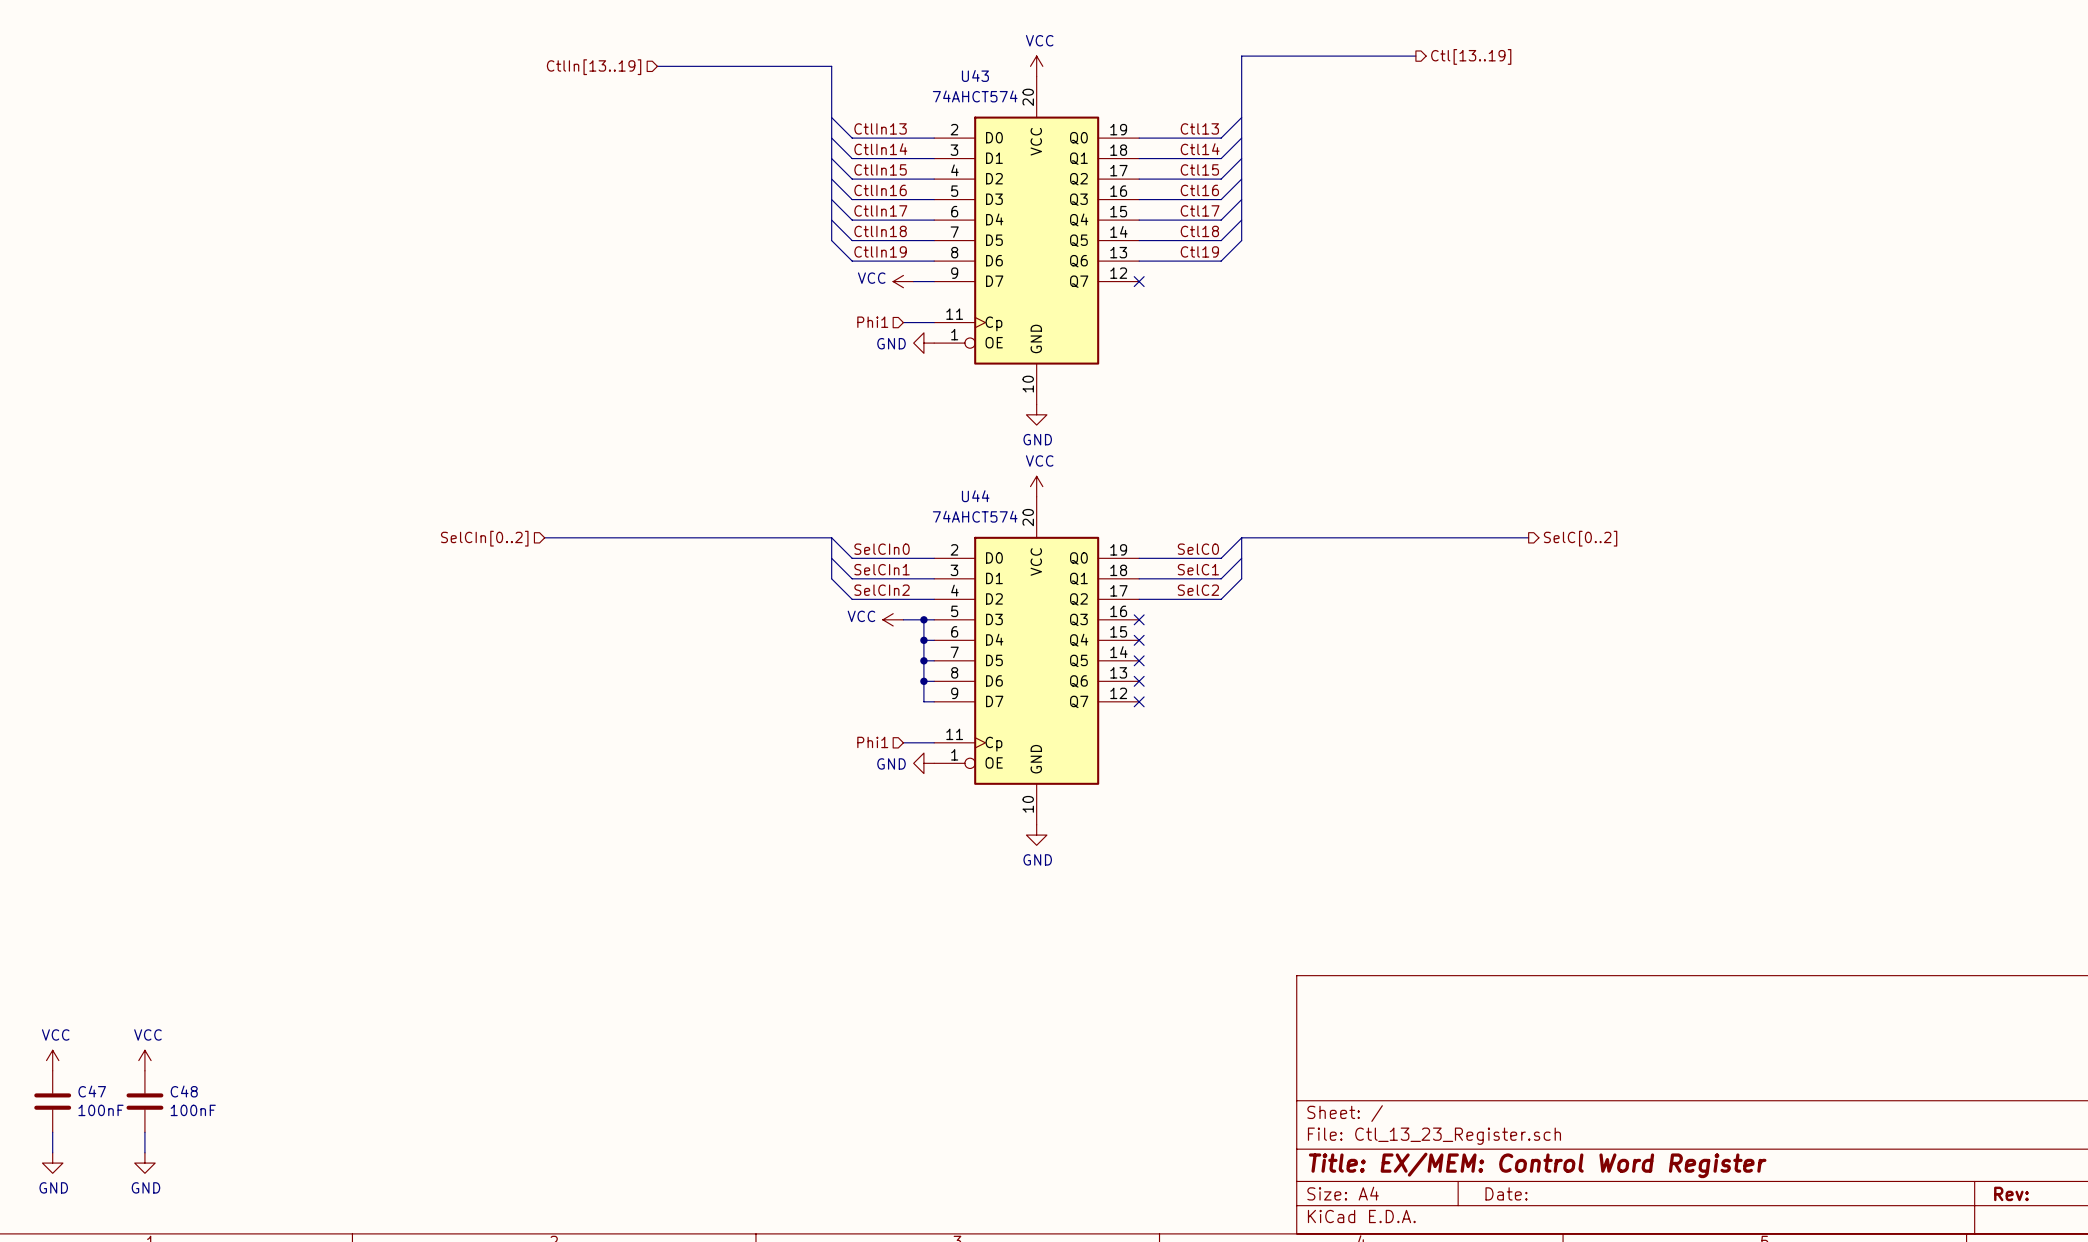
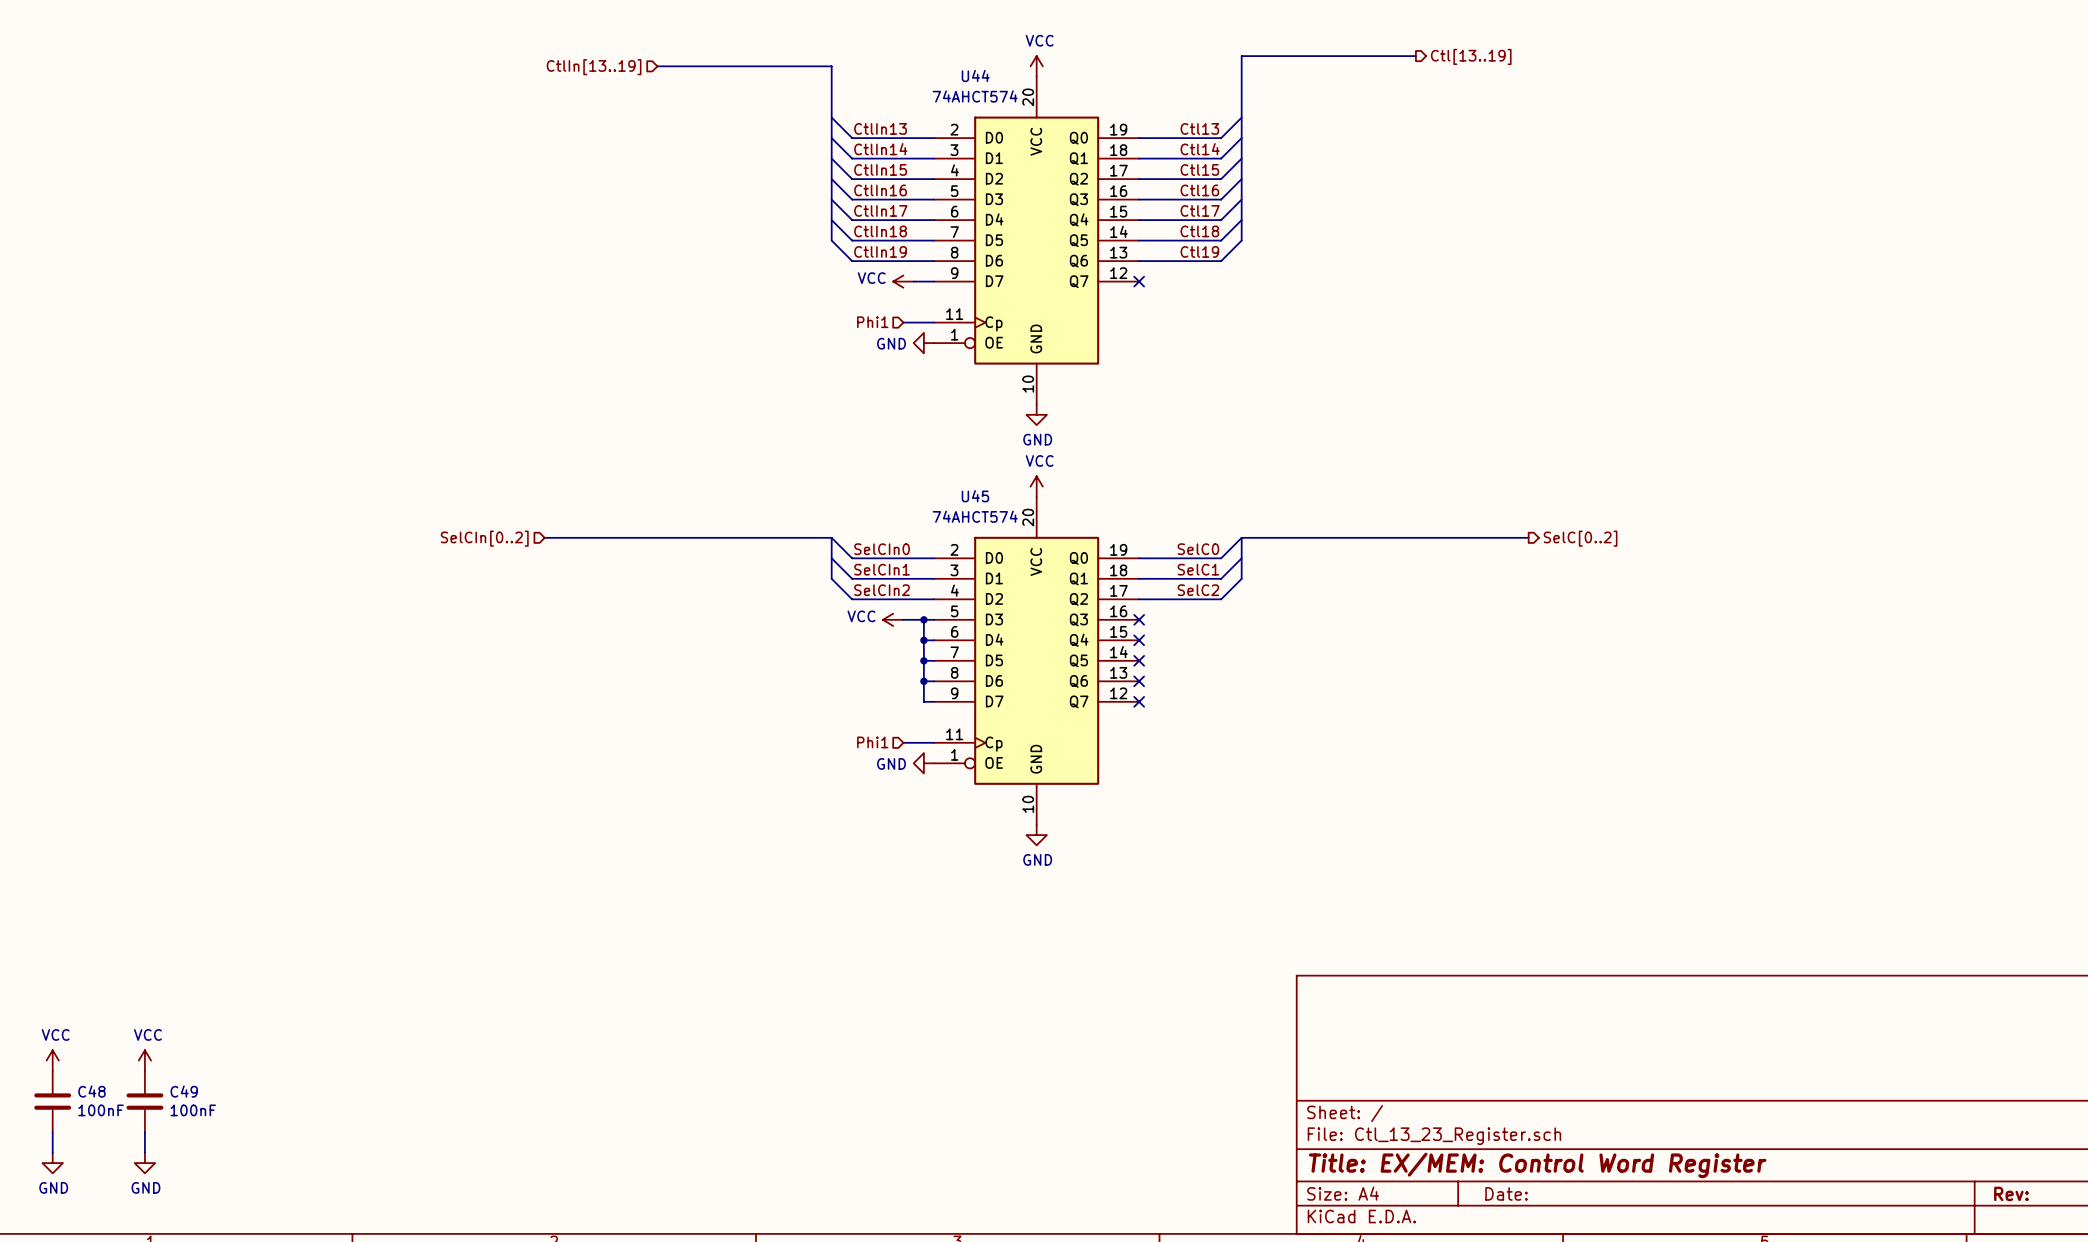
U43 name: U43 (975, 75) -> U44 (975, 75)
U44 name: U44 (975, 496) -> U45 (975, 496)
C47 name: C47 (92, 1091) -> C48 (91, 1091)
C48 name: C48 (184, 1091) -> C49 (184, 1091)

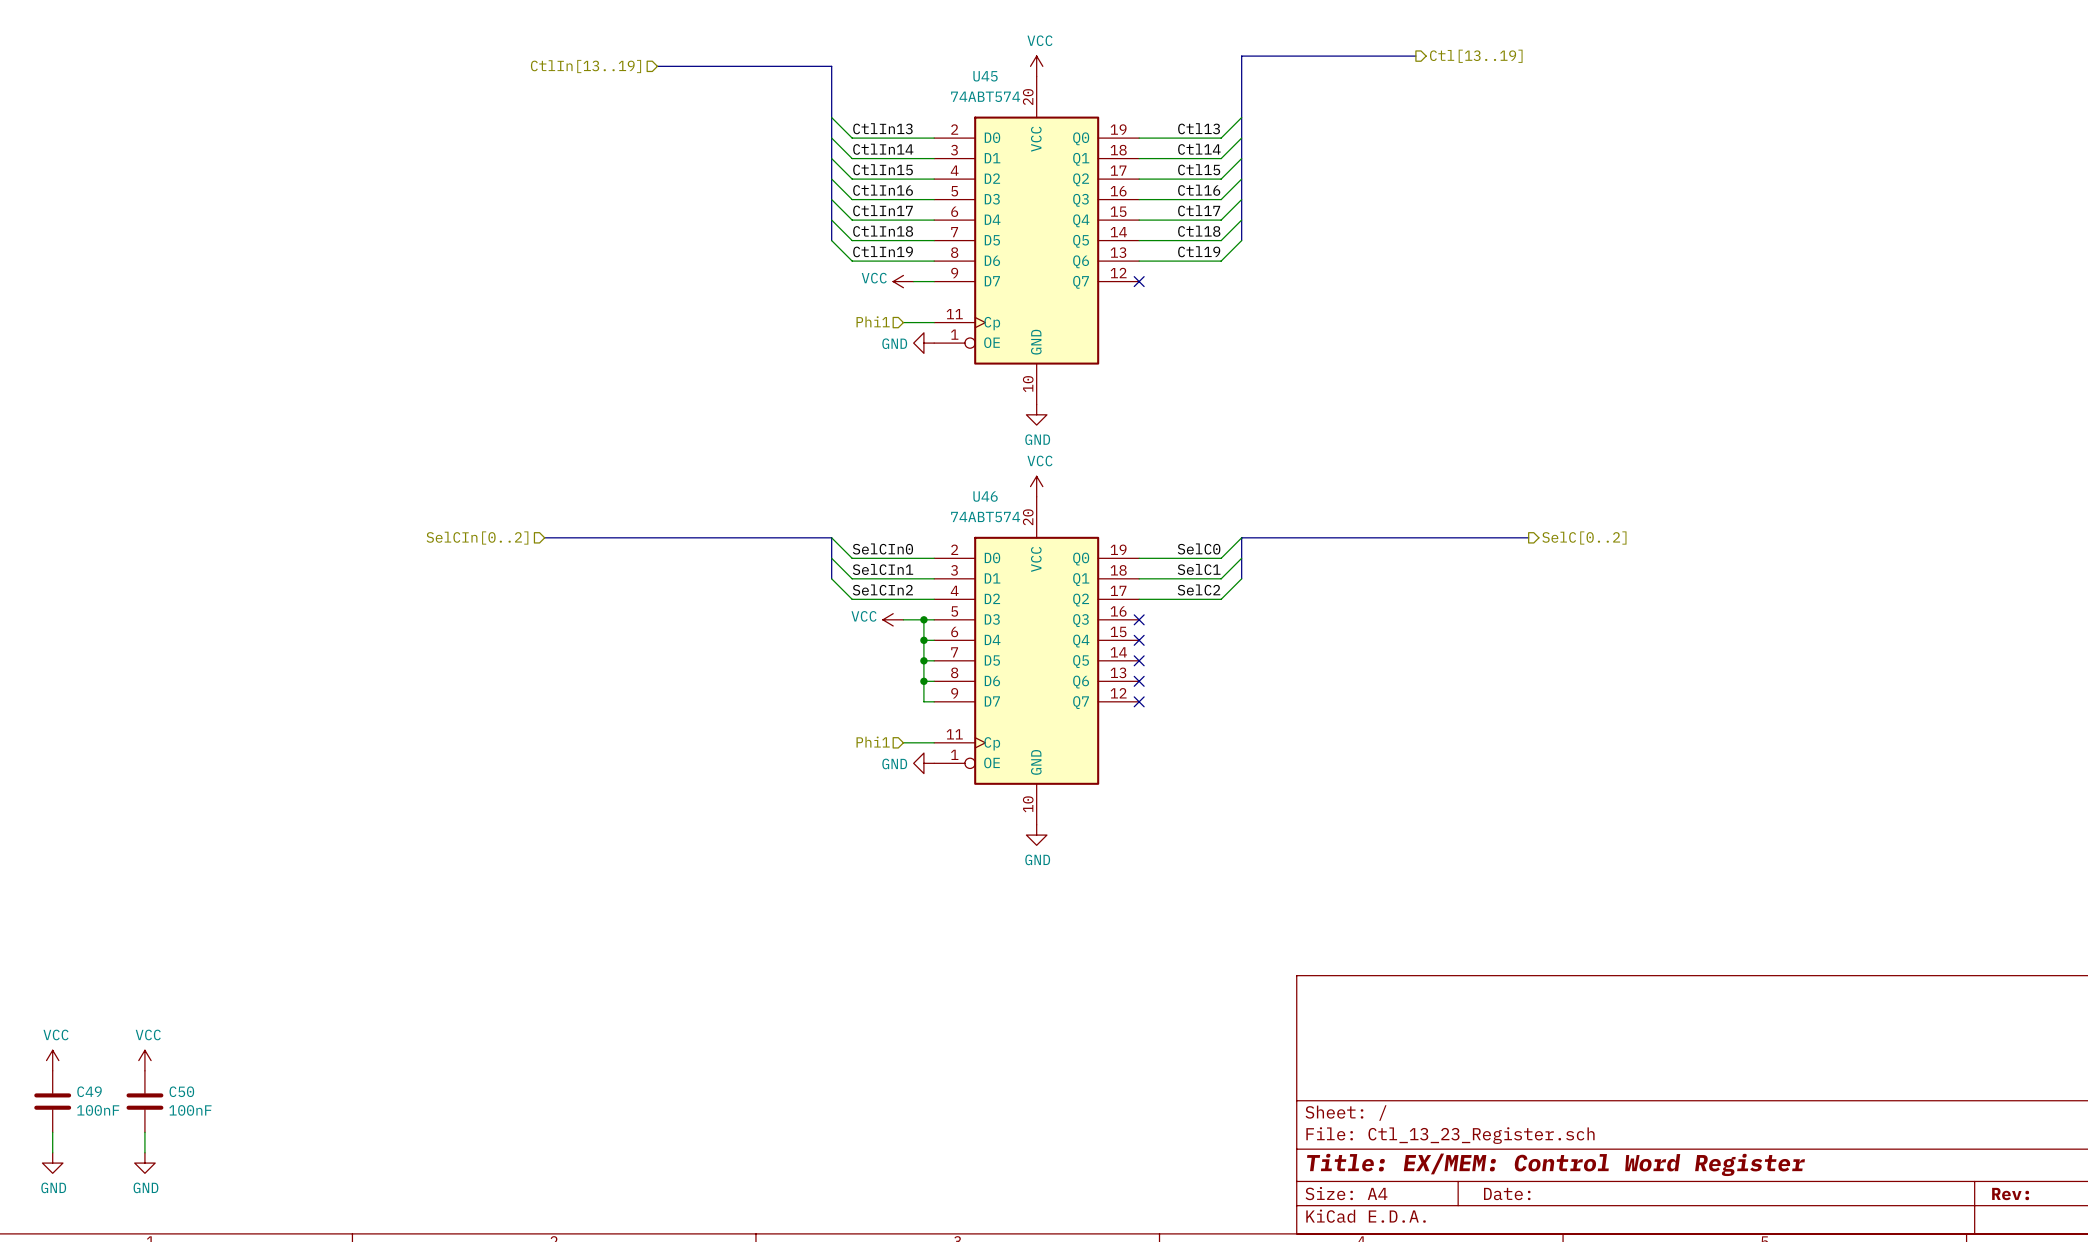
U44 name: U44 (975, 75) -> U45 (985, 76)
U44 value: 74AHCT574 (975, 96) -> 74ABT574 (985, 96)
U45 name: U45 (975, 496) -> U46 (985, 496)
U45 value: 74AHCT574 (975, 516) -> 74ABT574 (985, 517)
C48 name: C48 (91, 1091) -> C49 (89, 1091)
C49 name: C49 (184, 1091) -> C50 (181, 1091)

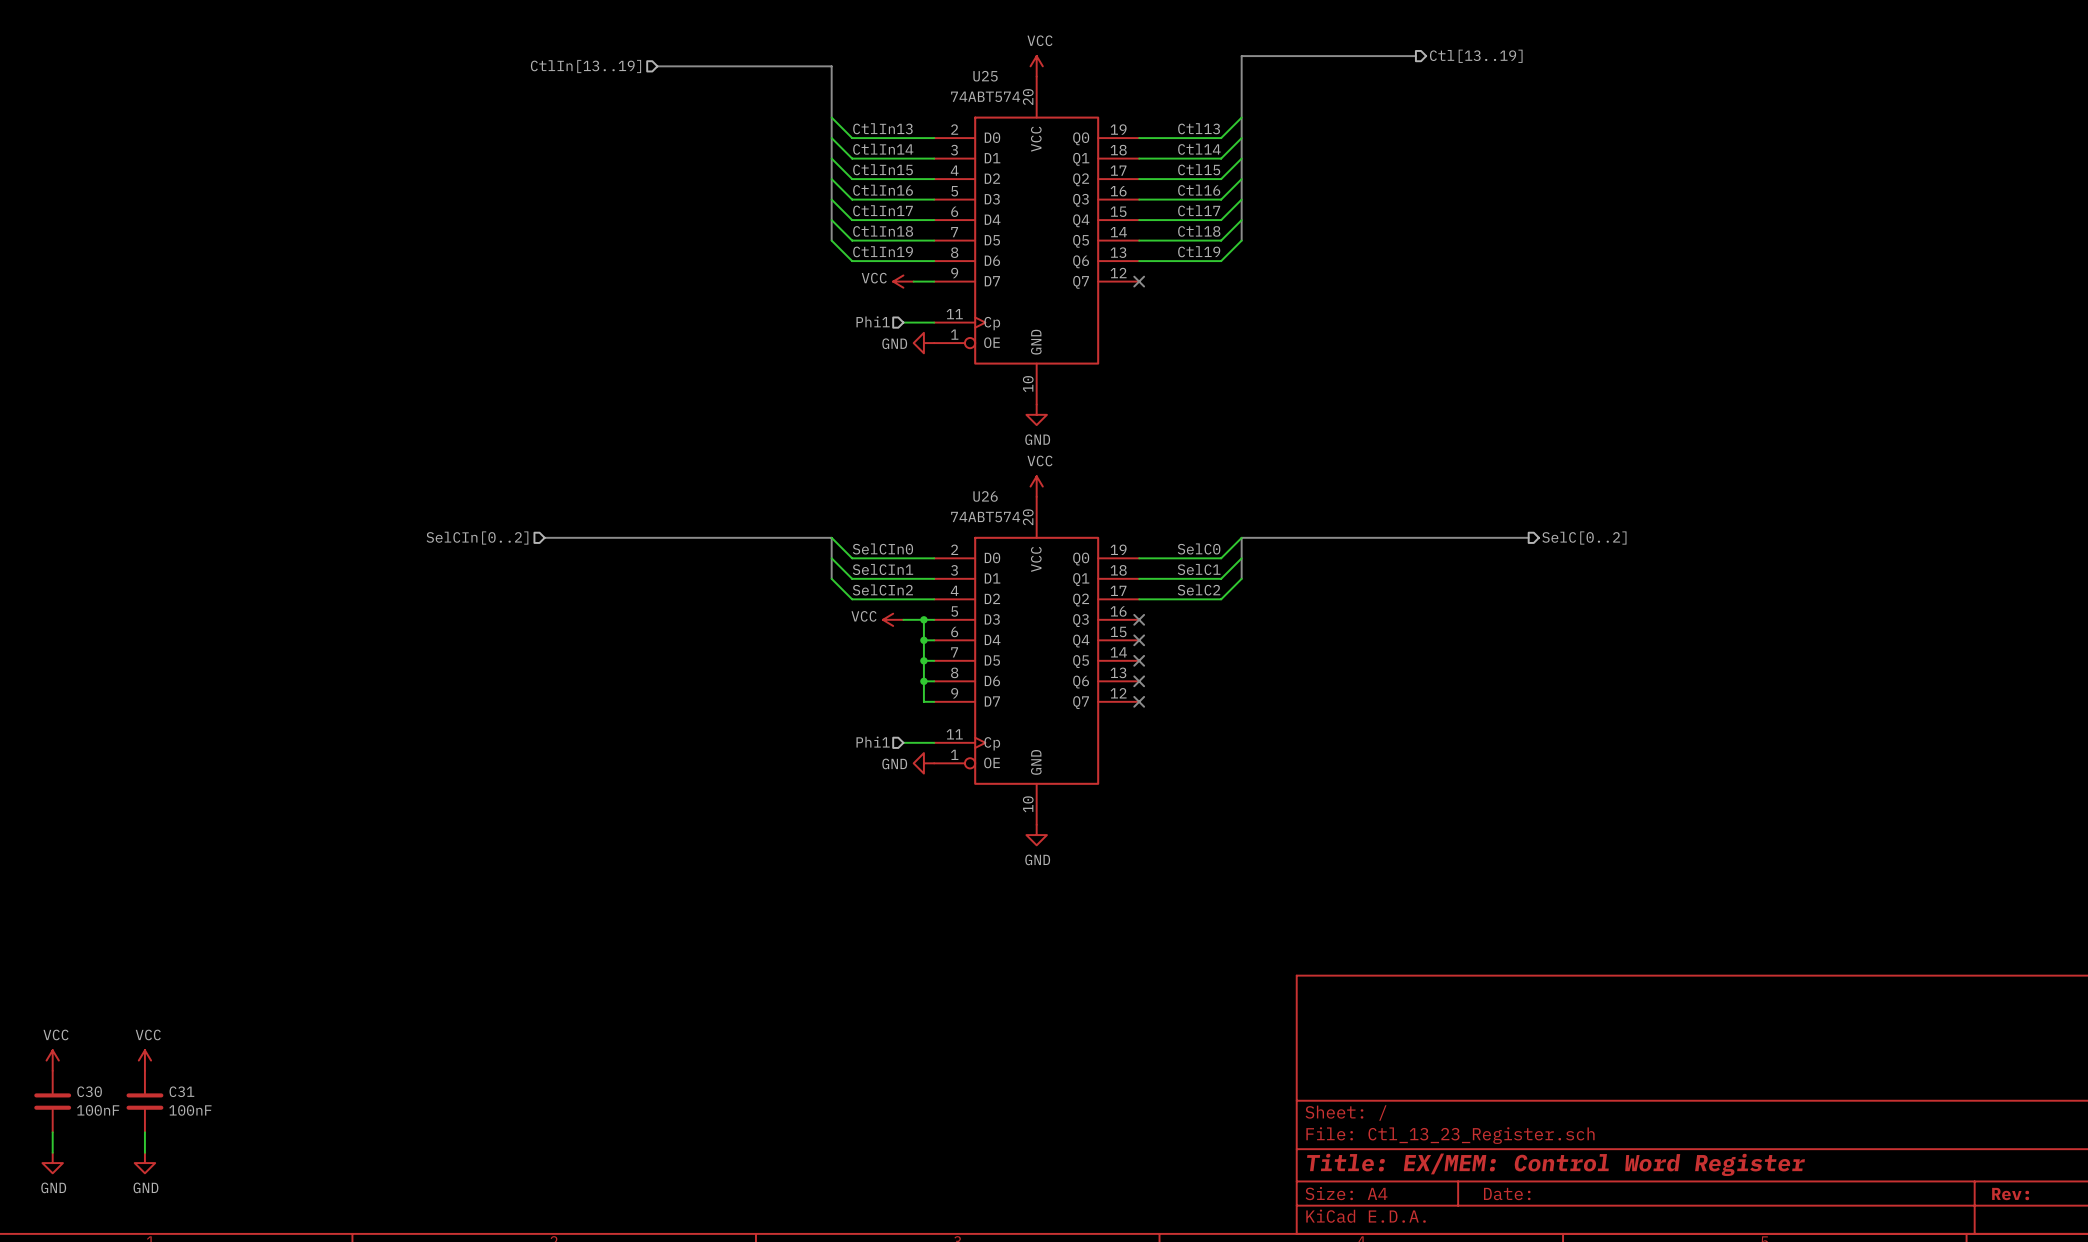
U45 name: U45 (985, 76) -> U25 (985, 76)
U46 name: U46 (985, 496) -> U26 (985, 496)
C49 name: C49 (89, 1091) -> C30 (89, 1091)
C50 name: C50 (181, 1091) -> C31 (181, 1091)

